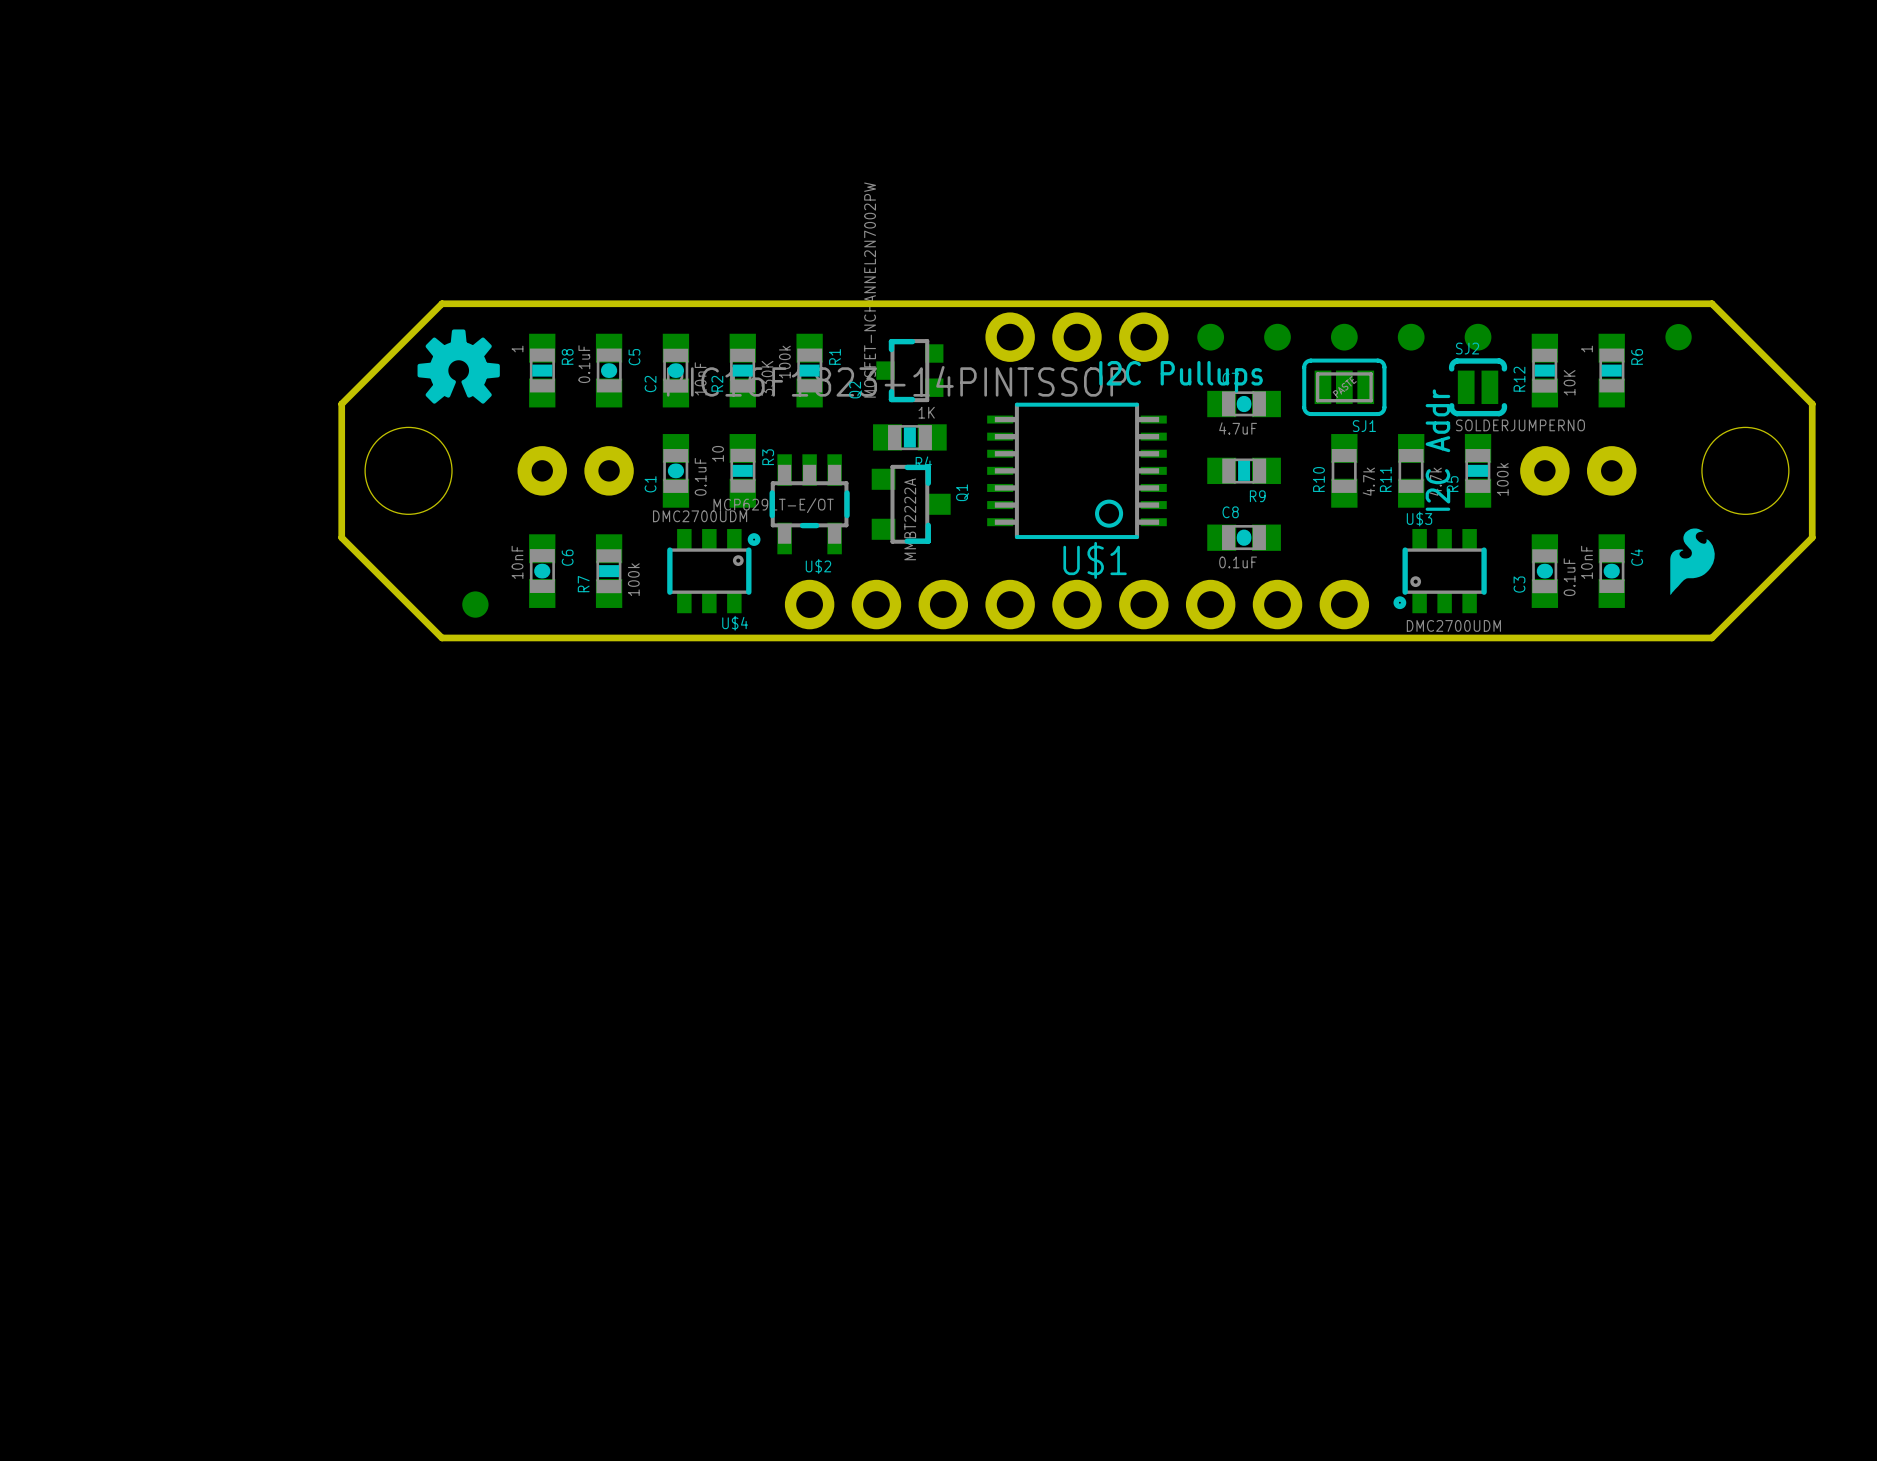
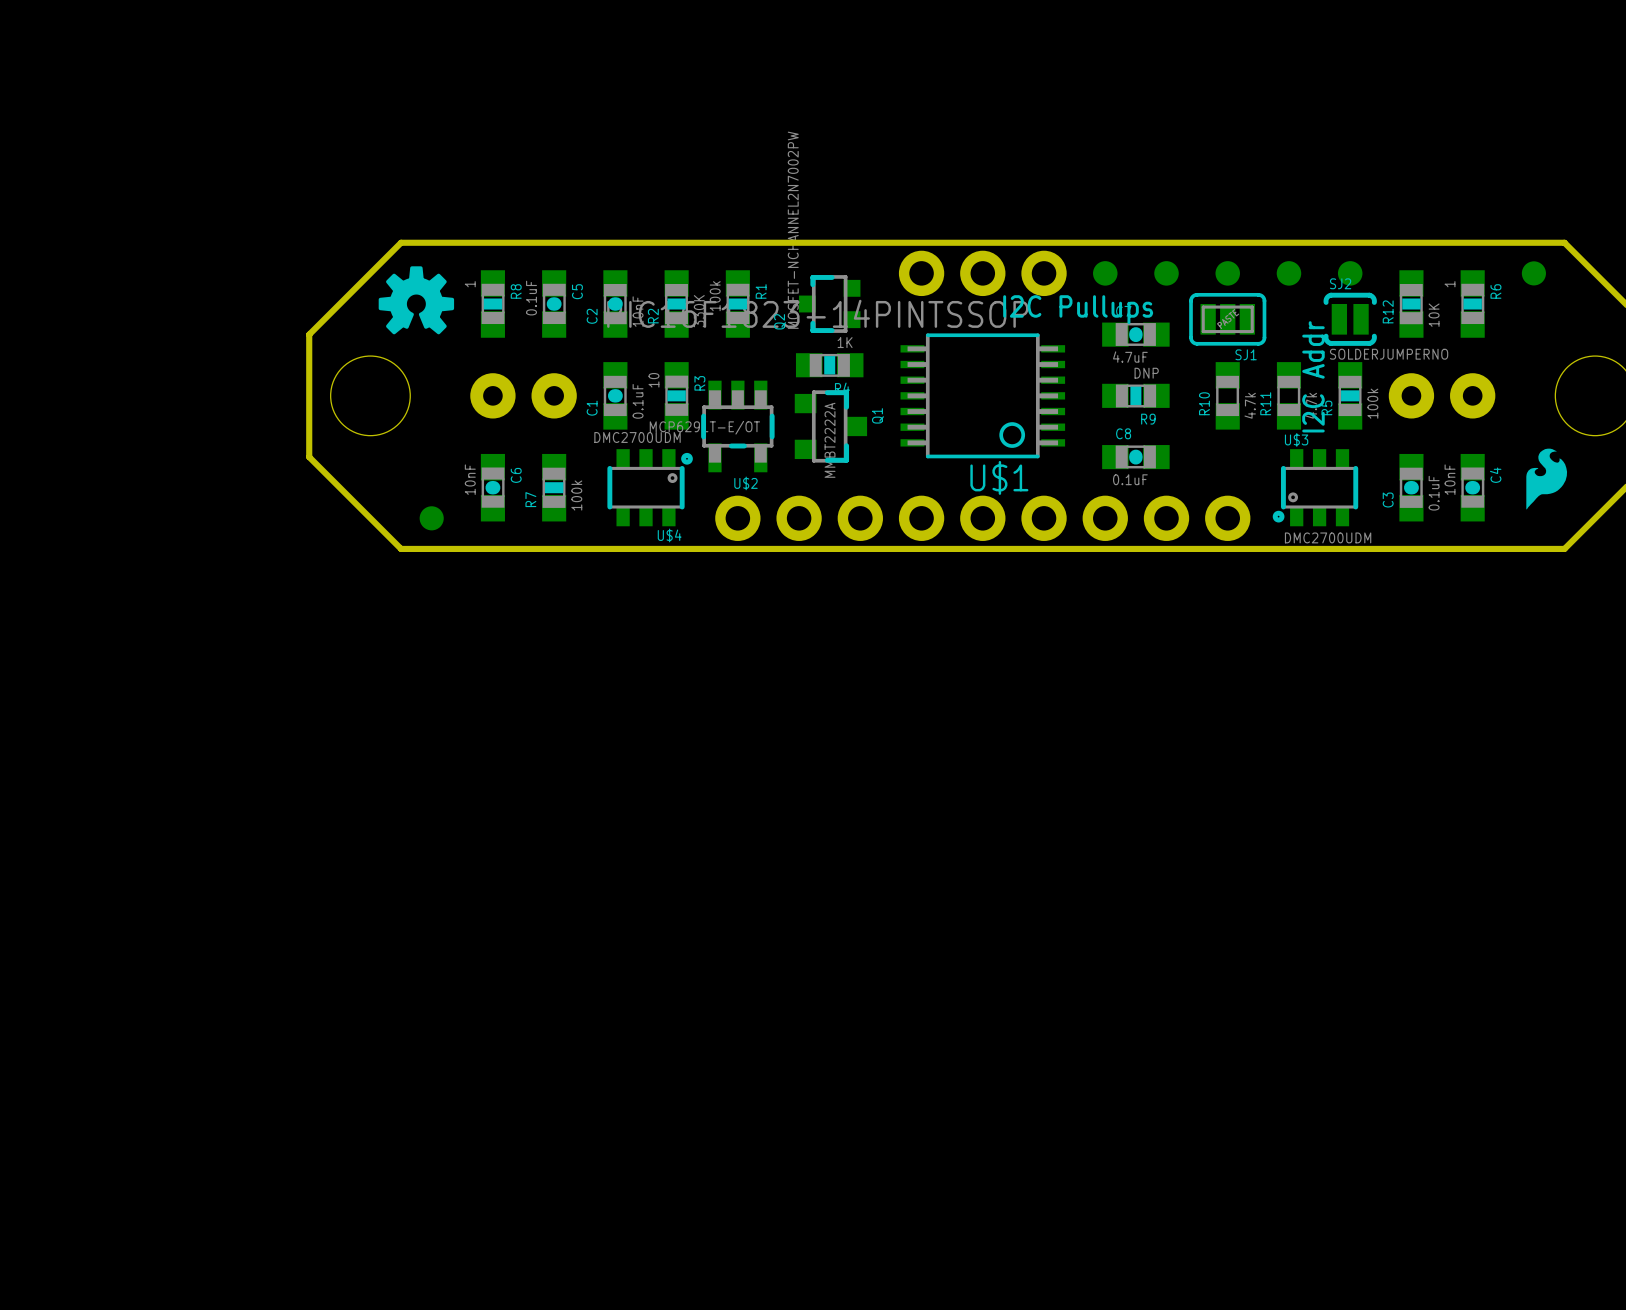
R9 value: none -> DNP (1146, 373)

